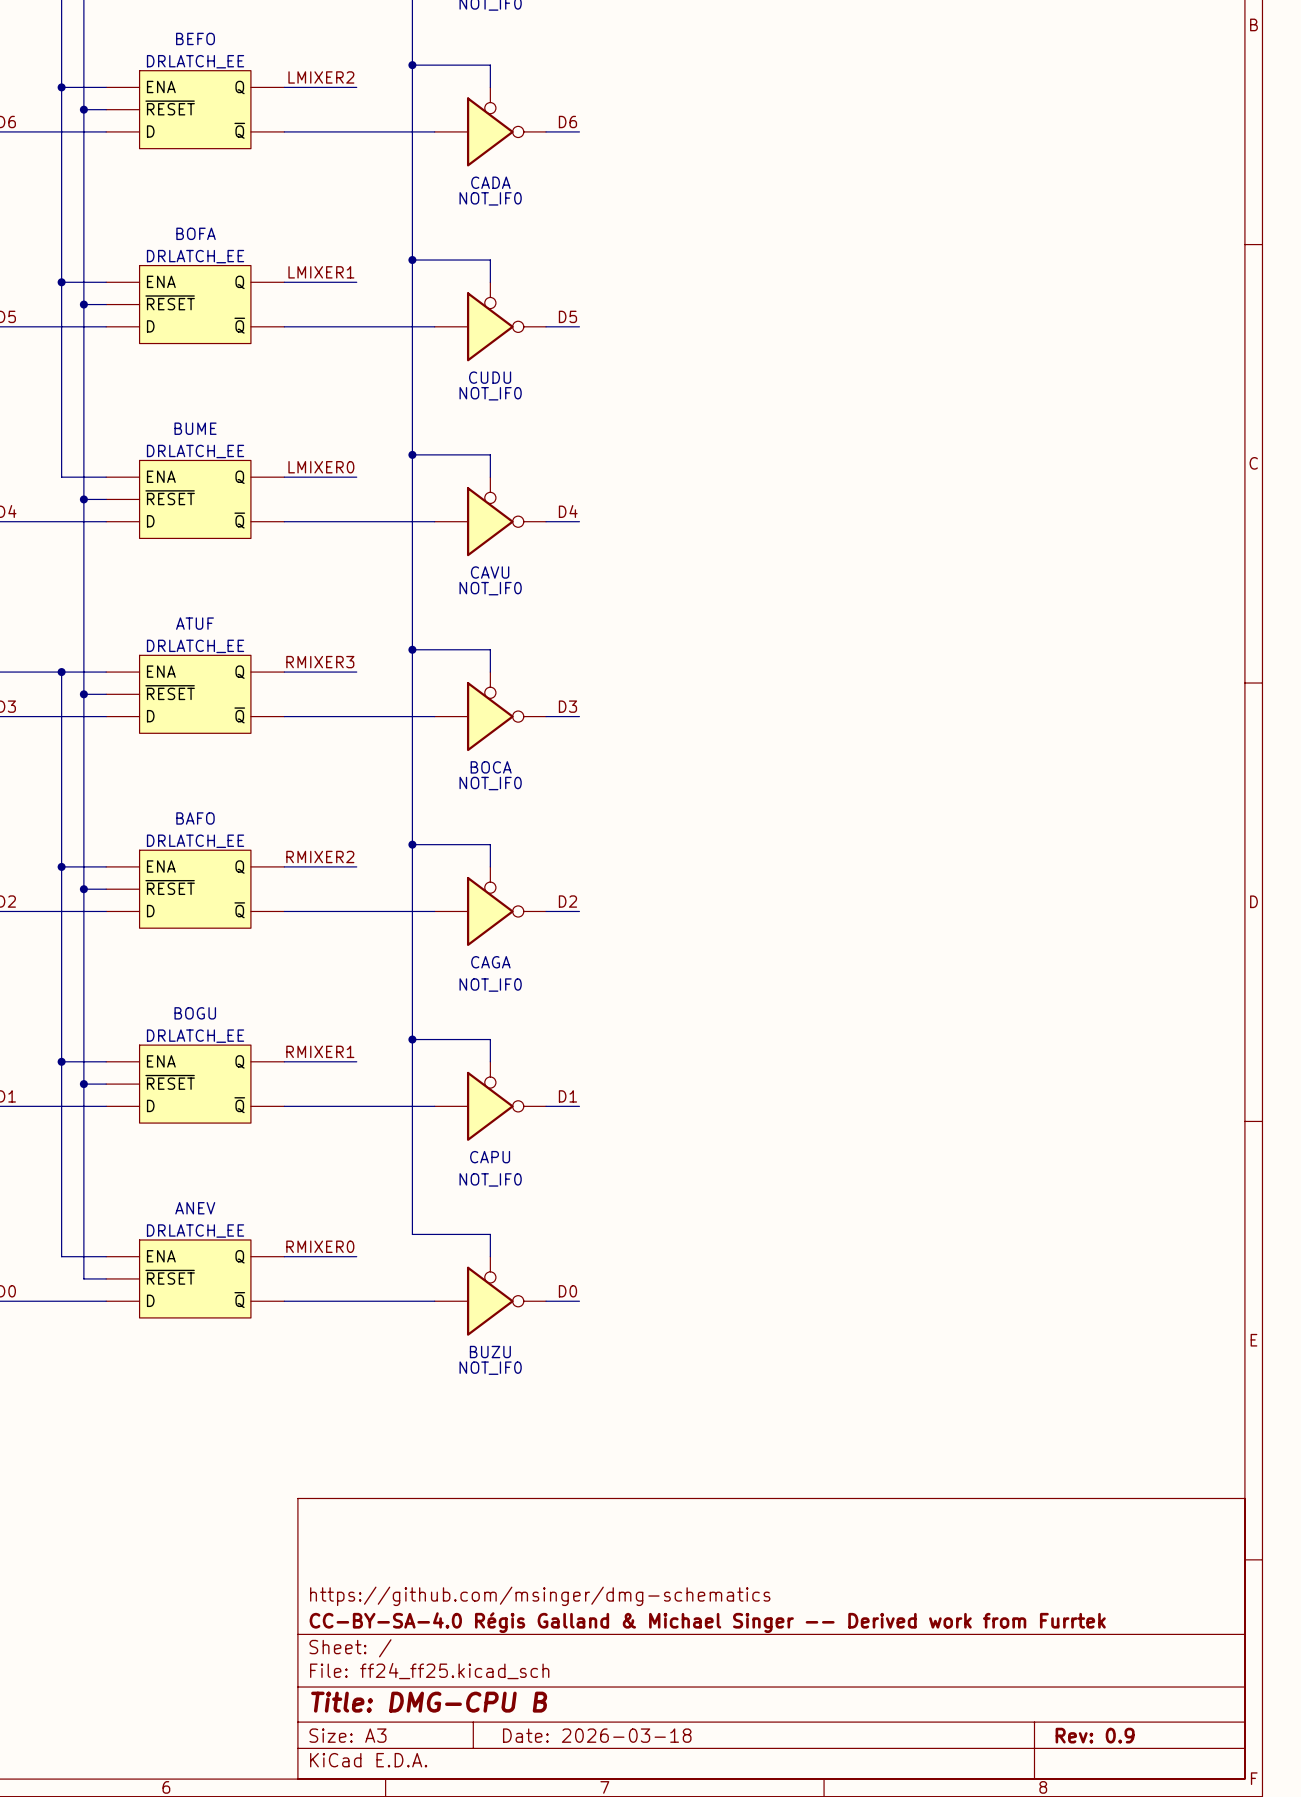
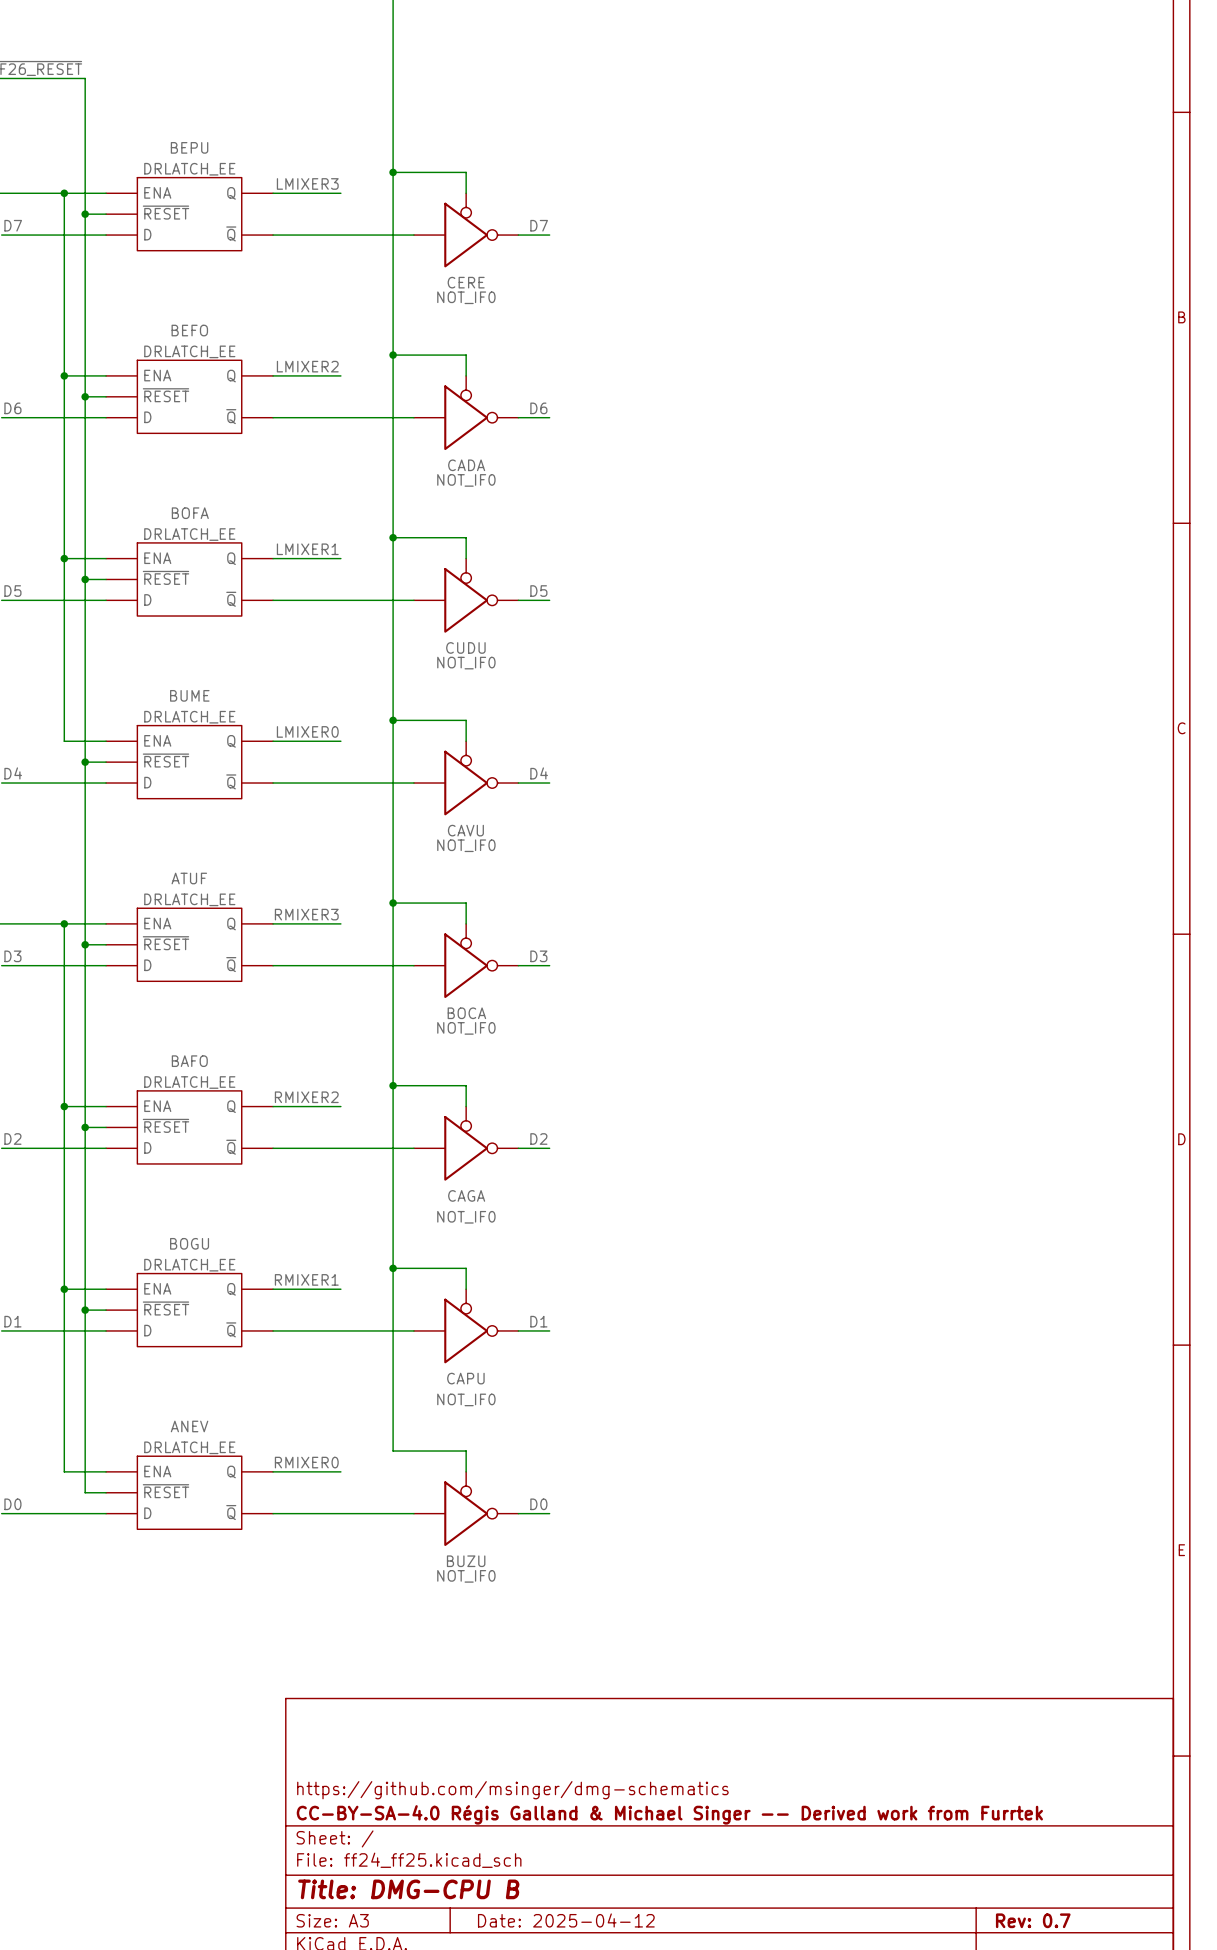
title block: Date: 2026-03-18 (597, 1735) -> Date: 2025-04-12 (566, 1920)
title block: Rev: 0.9 (1095, 1735) -> Rev: 0.7 (1033, 1920)

